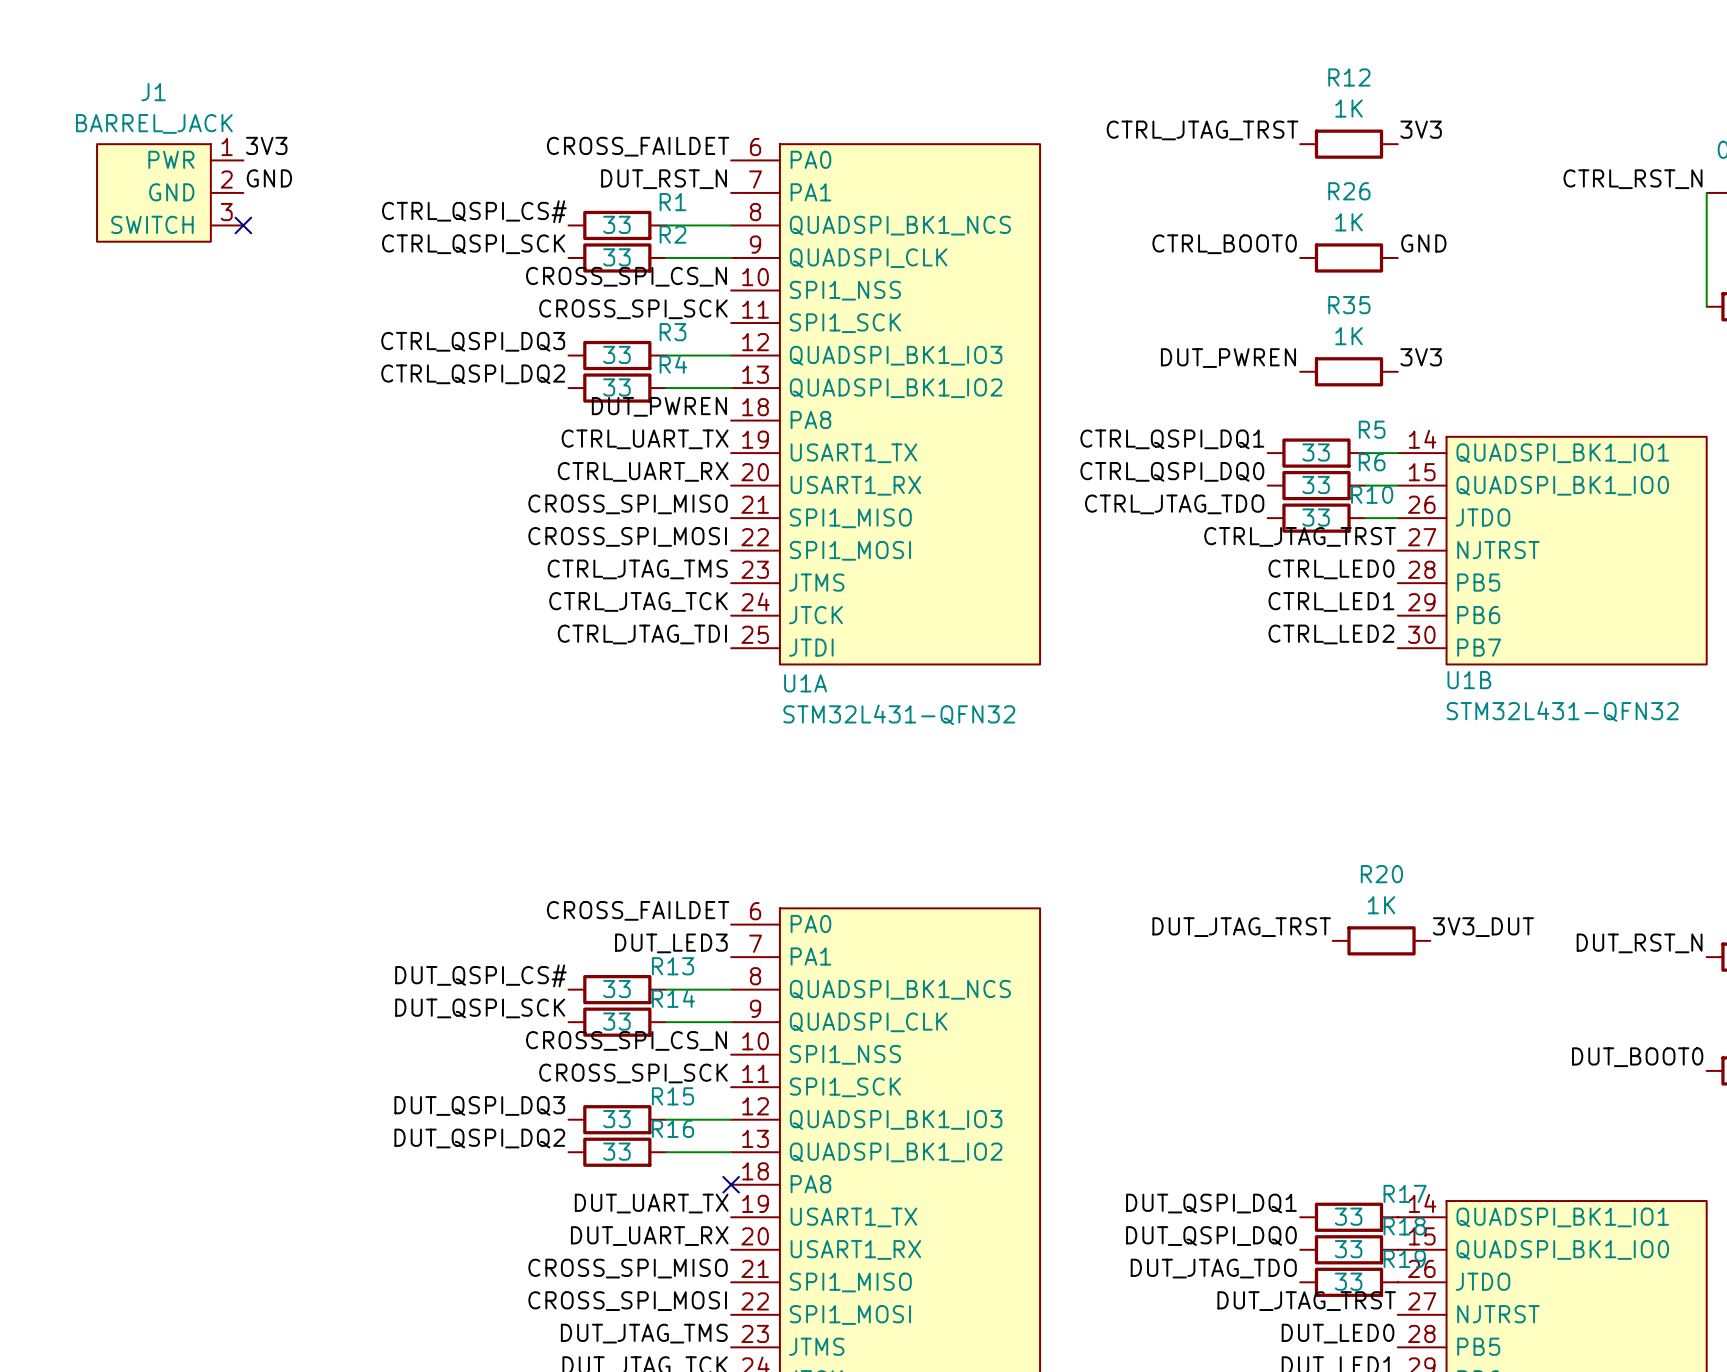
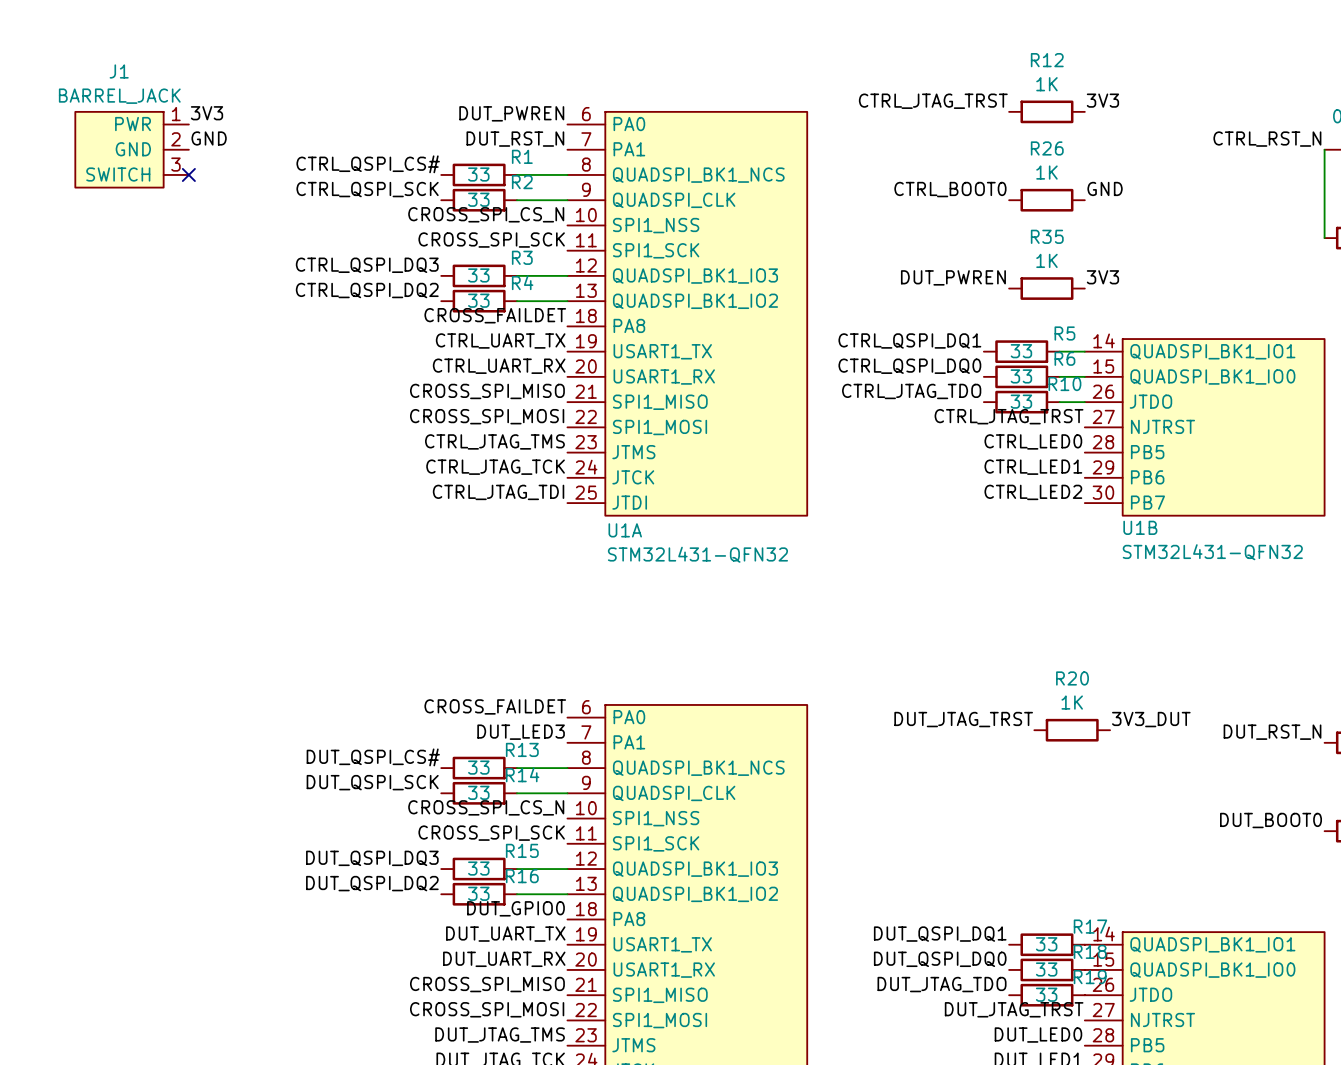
label: CROSS_FAILDET (638, 146) -> DUT_PWREN (511, 113)
label: DUT_PWREN (659, 406) -> CROSS_FAILDET (495, 315)
label: none -> DUT_GPIO0 (515, 908)
no-connect mark: (731, 1184) -> none

